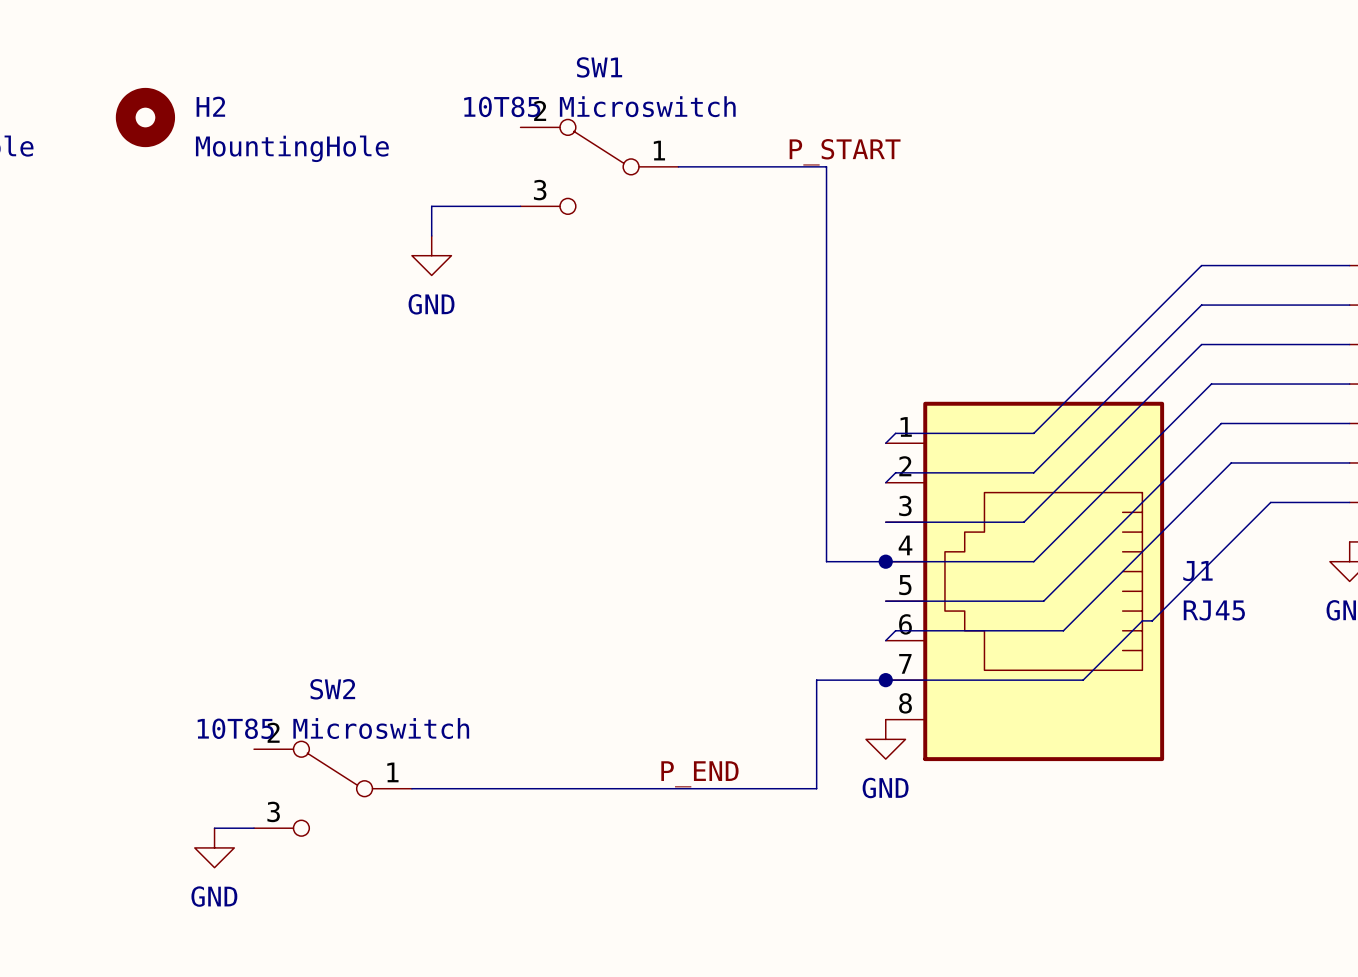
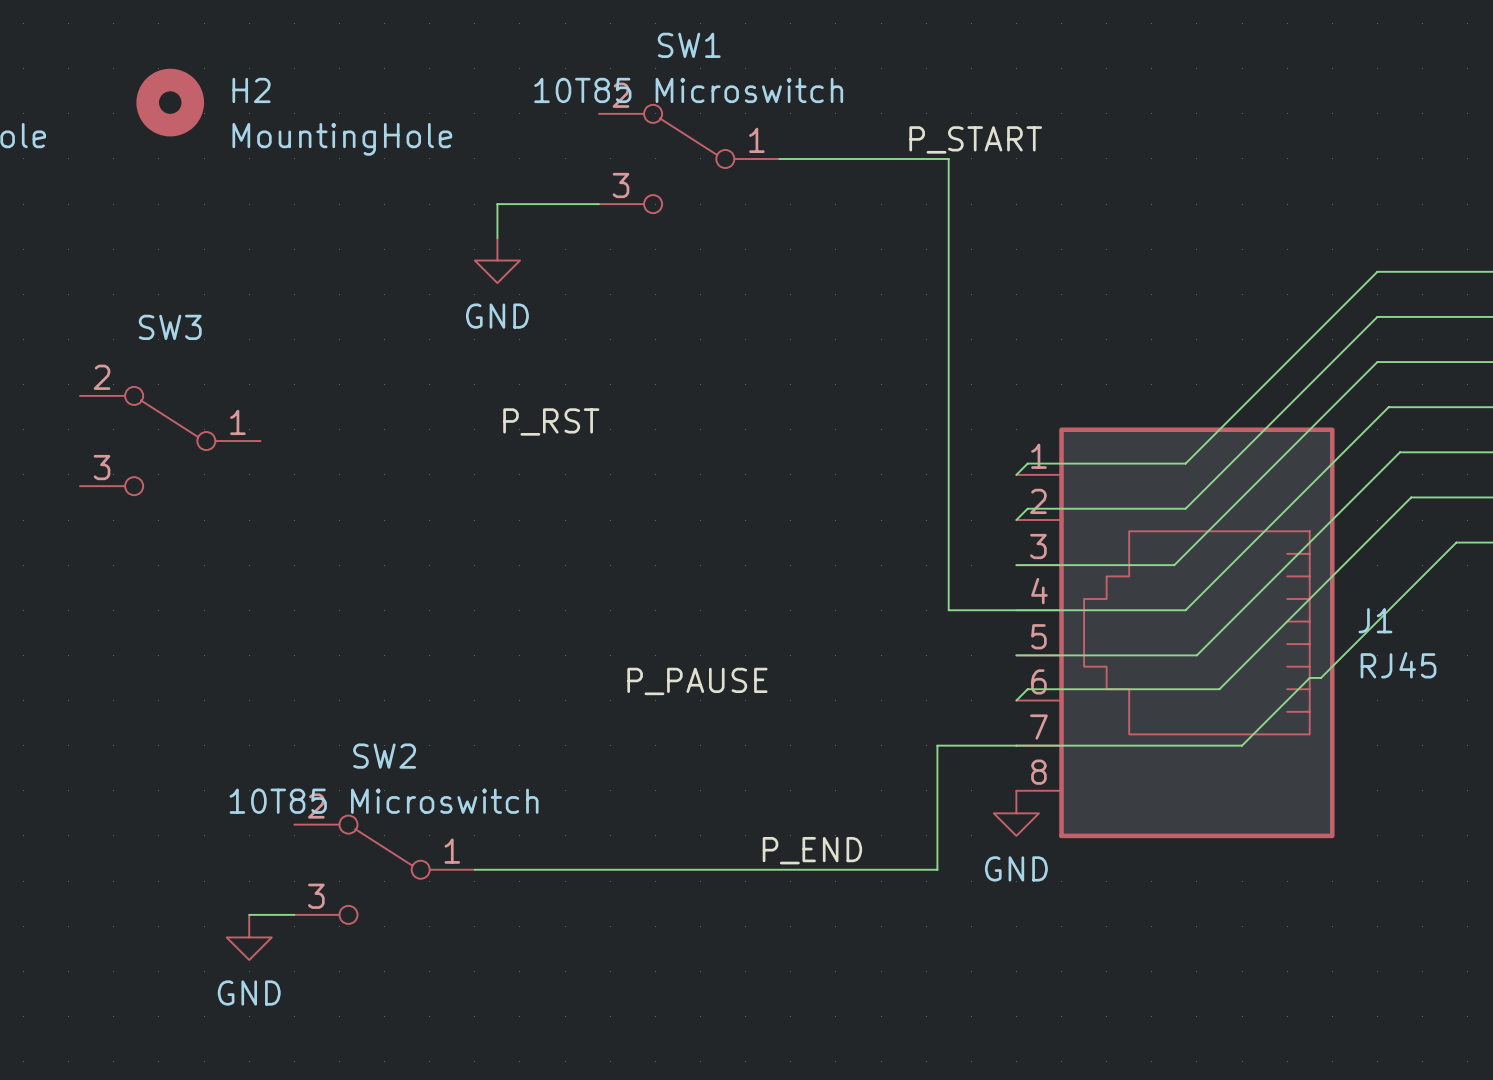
label: none -> P_RST (551, 421)
SW3: none -> (170, 441)
junction: (885, 561) -> none
label: none -> P_PAUSE (697, 681)
junction: (885, 680) -> none

